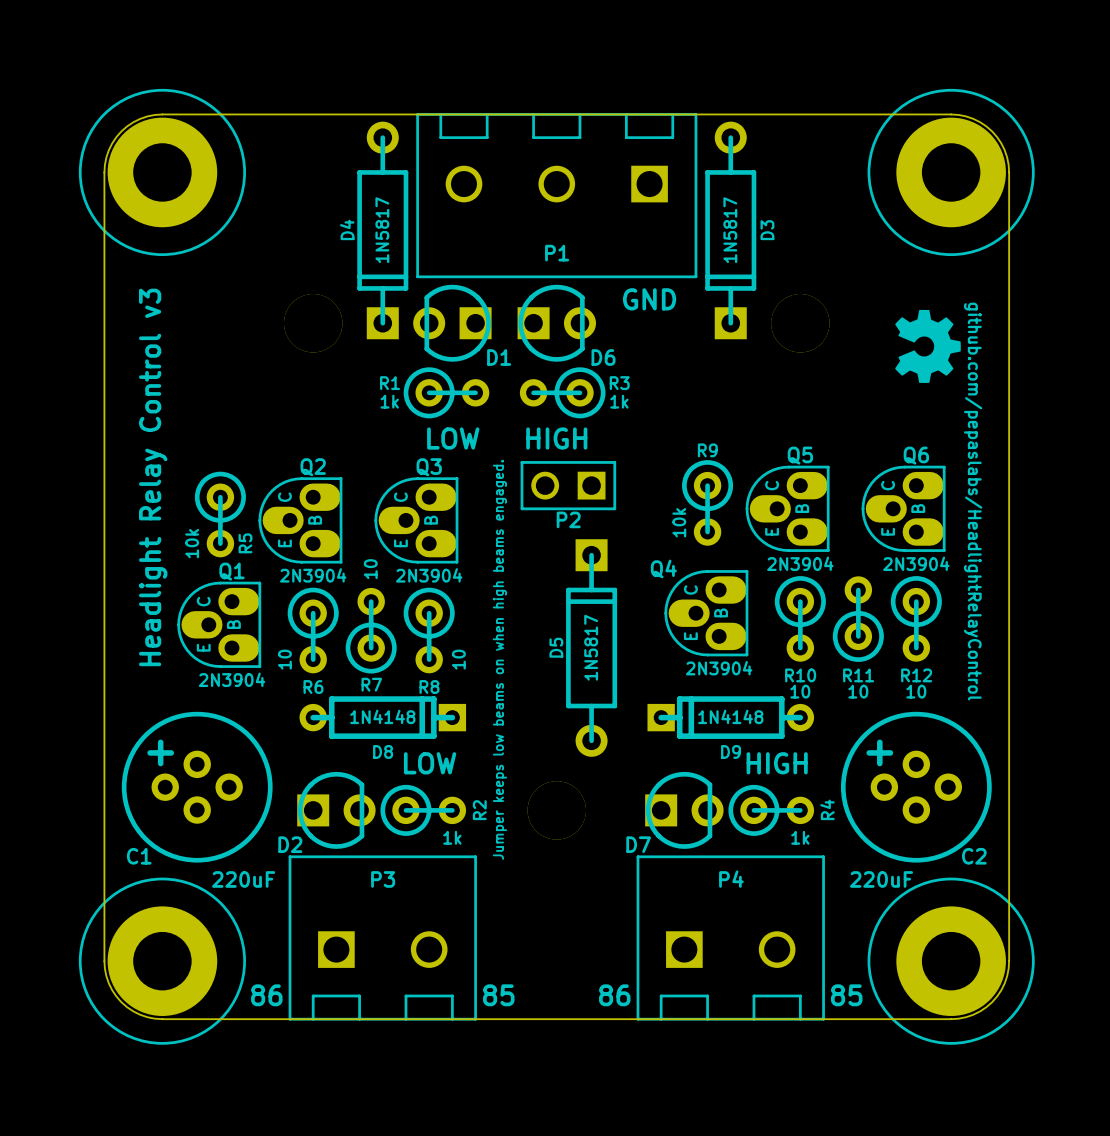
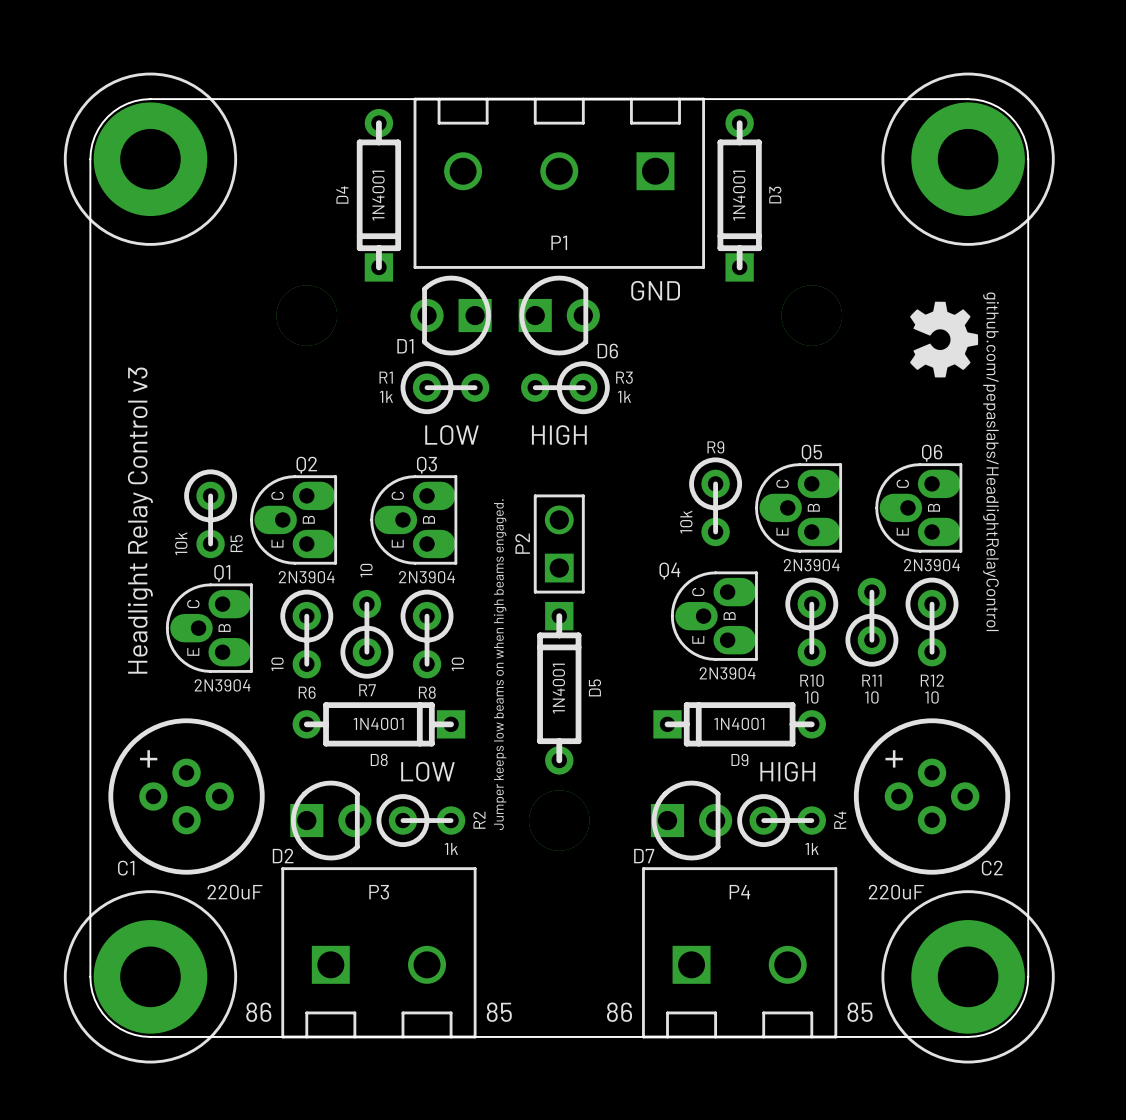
D4 footprint: [357, 121, 409, 340] -> [356, 108, 402, 282]
D3 footprint: [705, 121, 757, 340] -> [717, 108, 762, 282]
D4 value: 1N5817 (382, 230) -> 1N4001 (378, 195)
D3 value: 1N5817 (730, 230) -> 1N4001 (739, 195)
D1 name position: D1 (499, 357) -> D1 (405, 346)
P2 rotation: 0° (568, 485) -> 90° clockwise (559, 543)
P2 position: (568, 485) -> (559, 543)
D5 footprint: [566, 539, 618, 757] -> [537, 601, 582, 775]
D5 name position: D5 (556, 647) -> D5 (594, 687)
D5 value: 1N5817 (591, 647) -> 1N4001 (558, 688)
D8 value: 1N4148 (382, 716) -> 1N4001 (378, 723)
D9 value: 1N4148 (730, 716) -> 1N4001 (739, 723)

